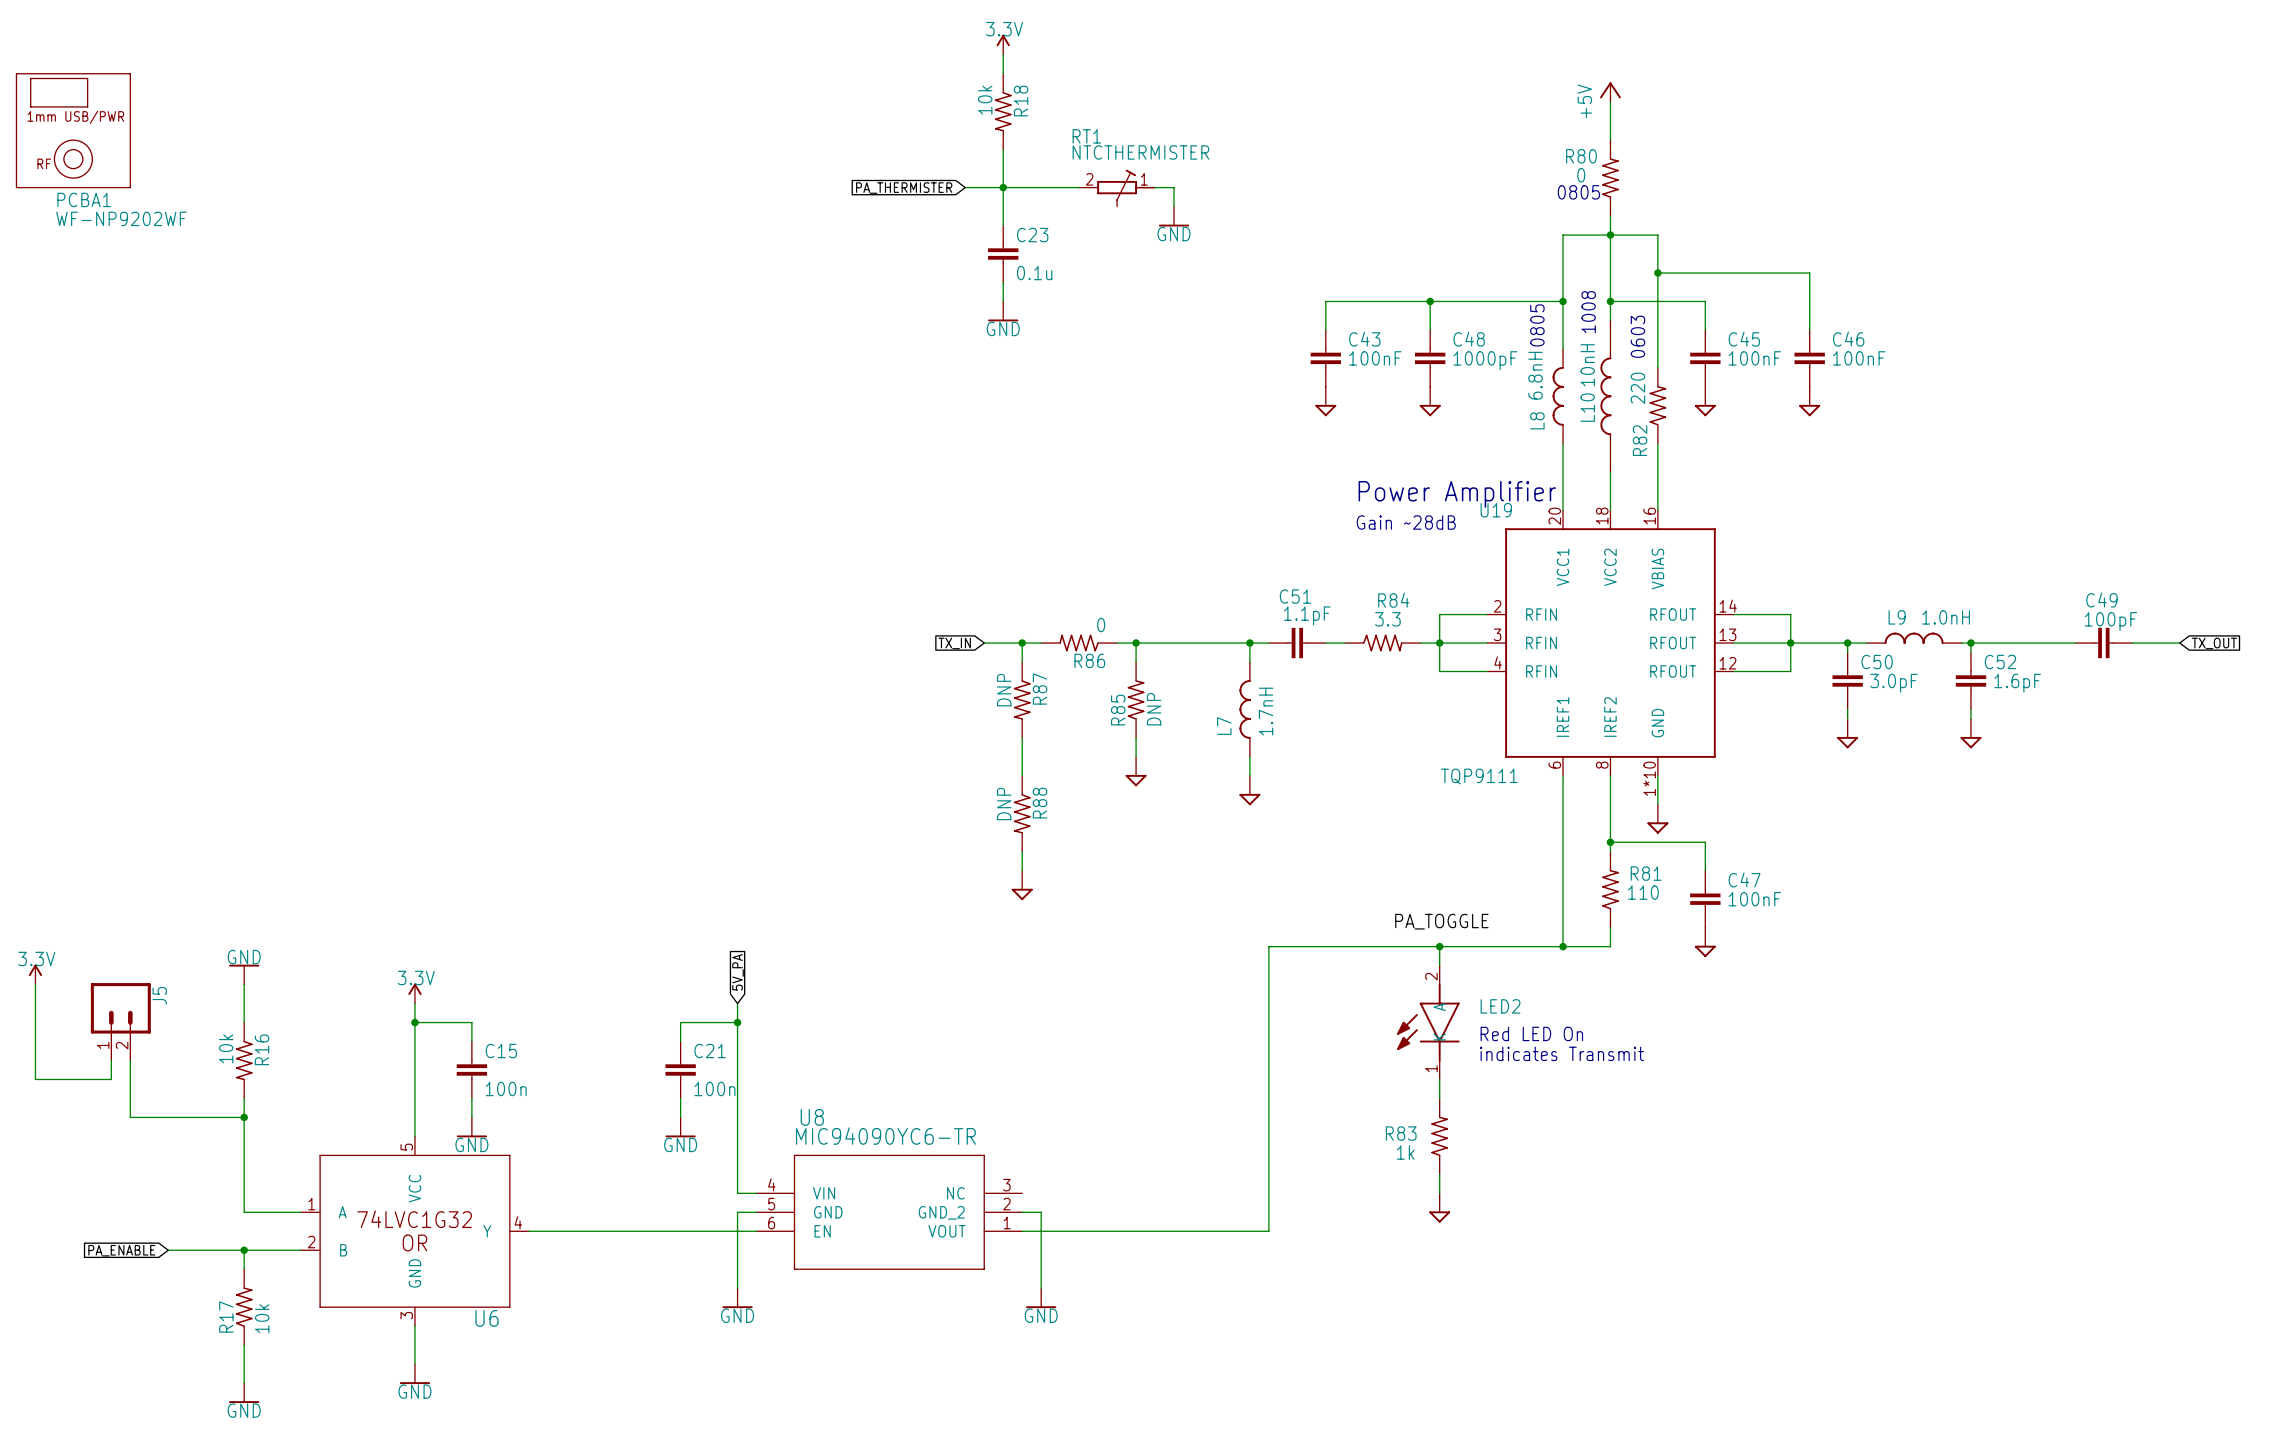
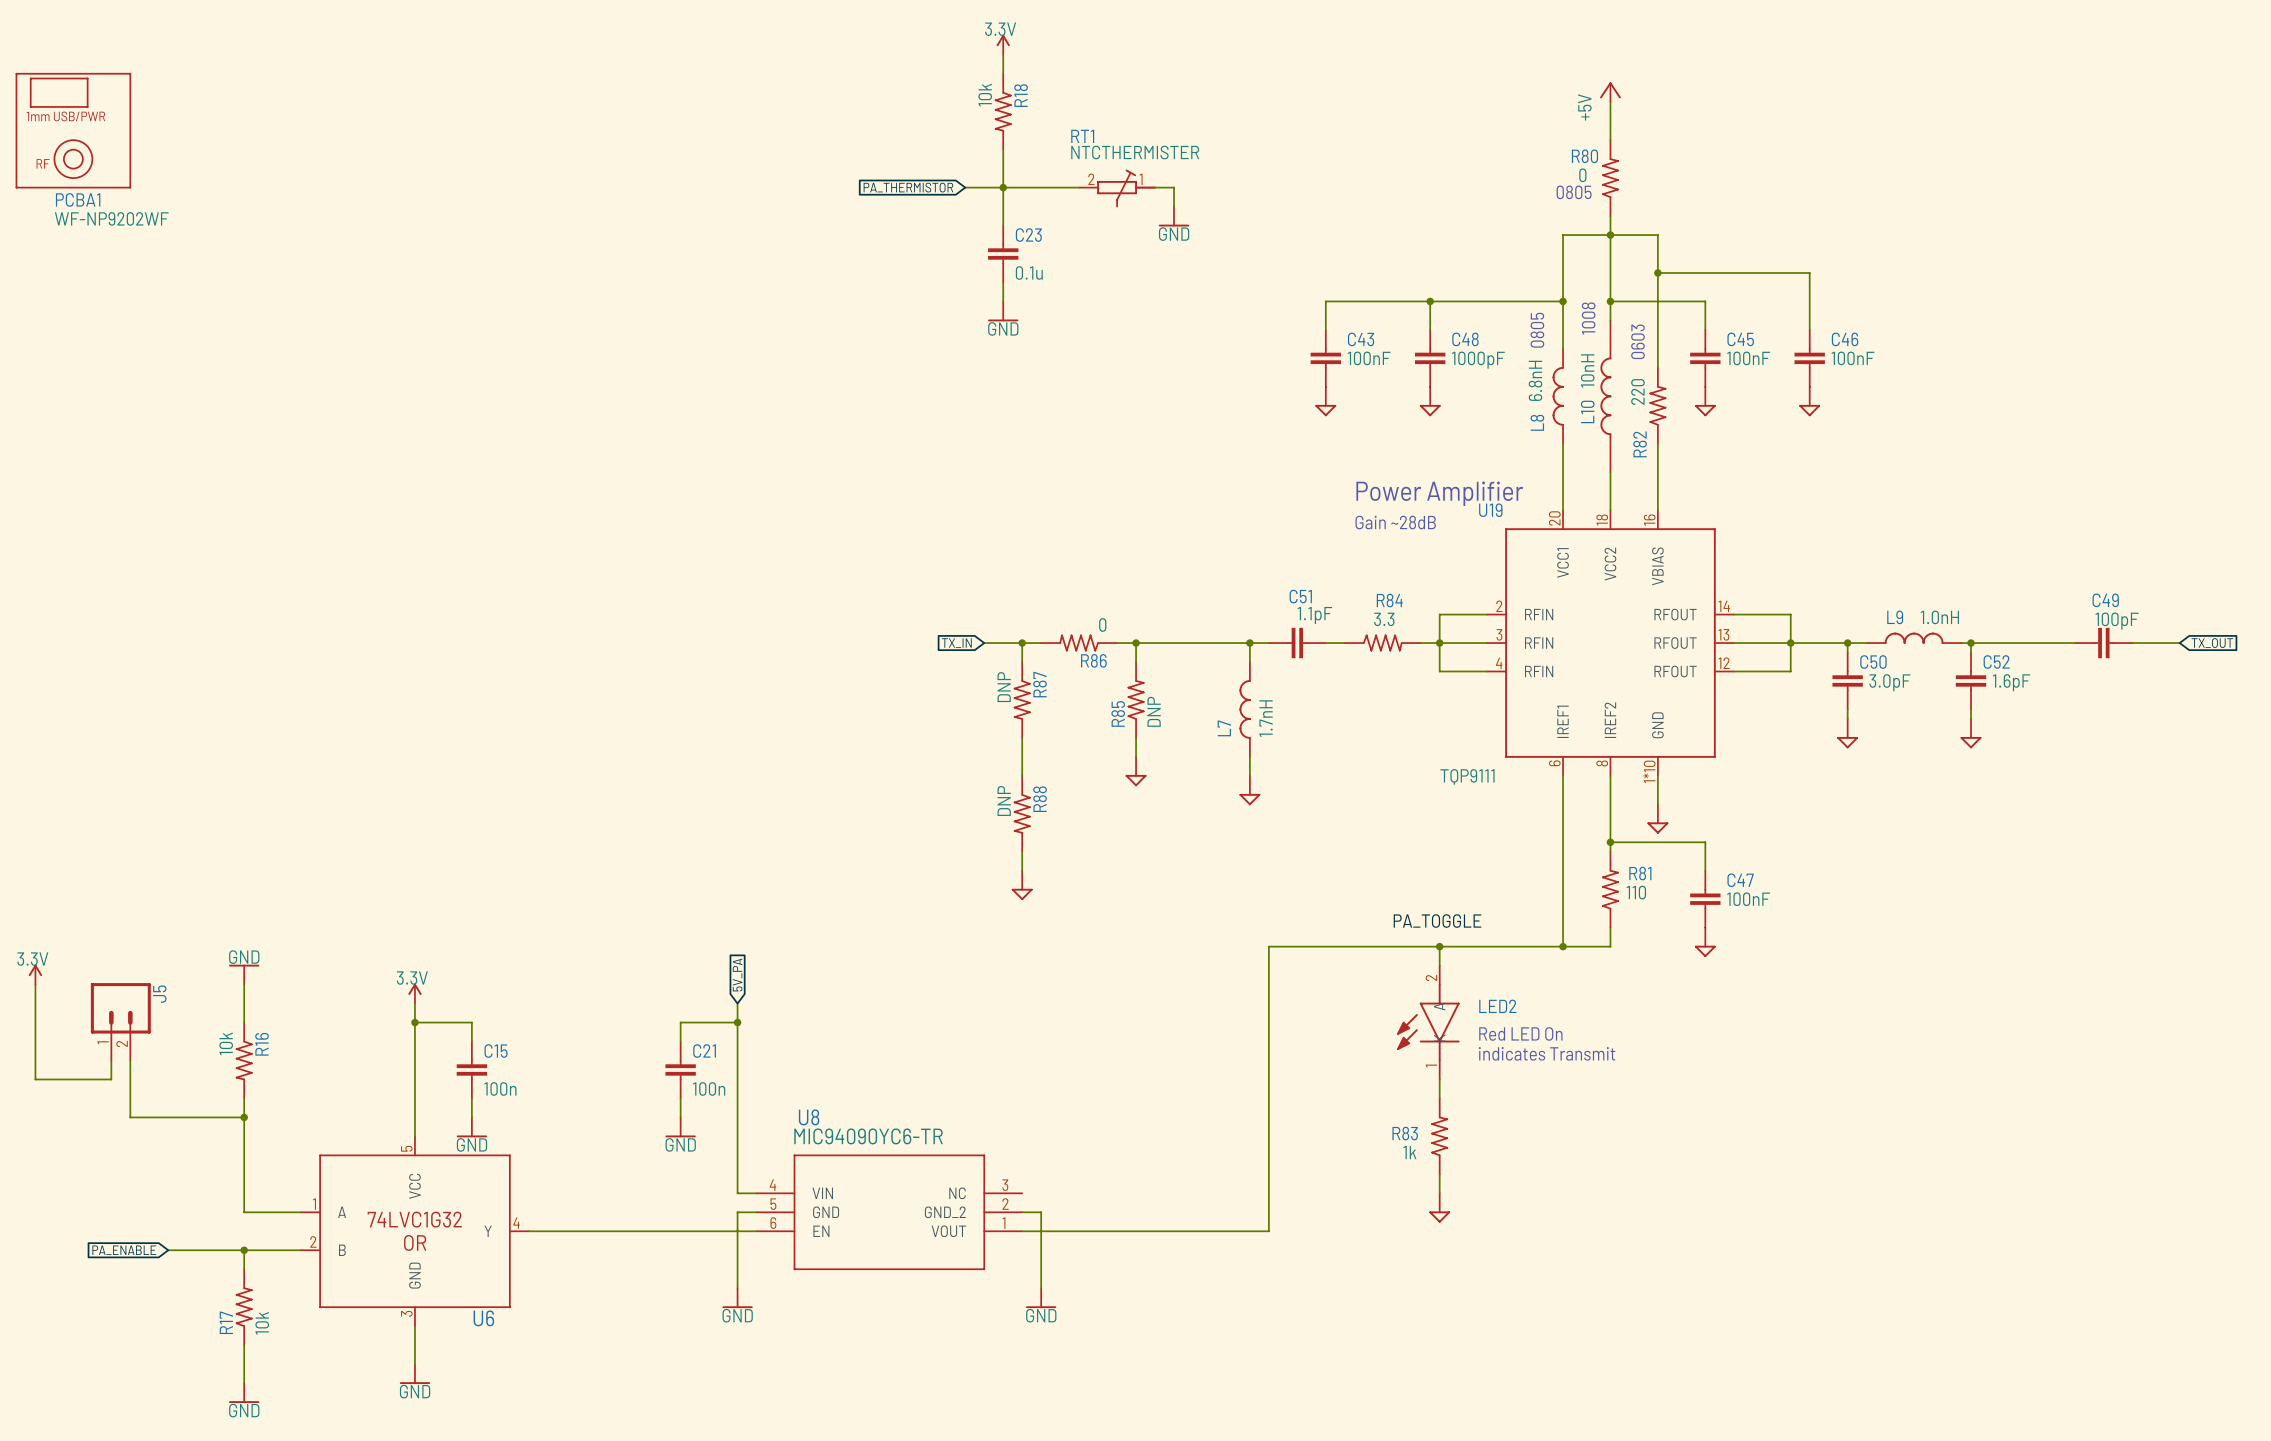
global label: PA_THERMISTER (904, 188) -> PA_THERMISTOR (908, 187)

